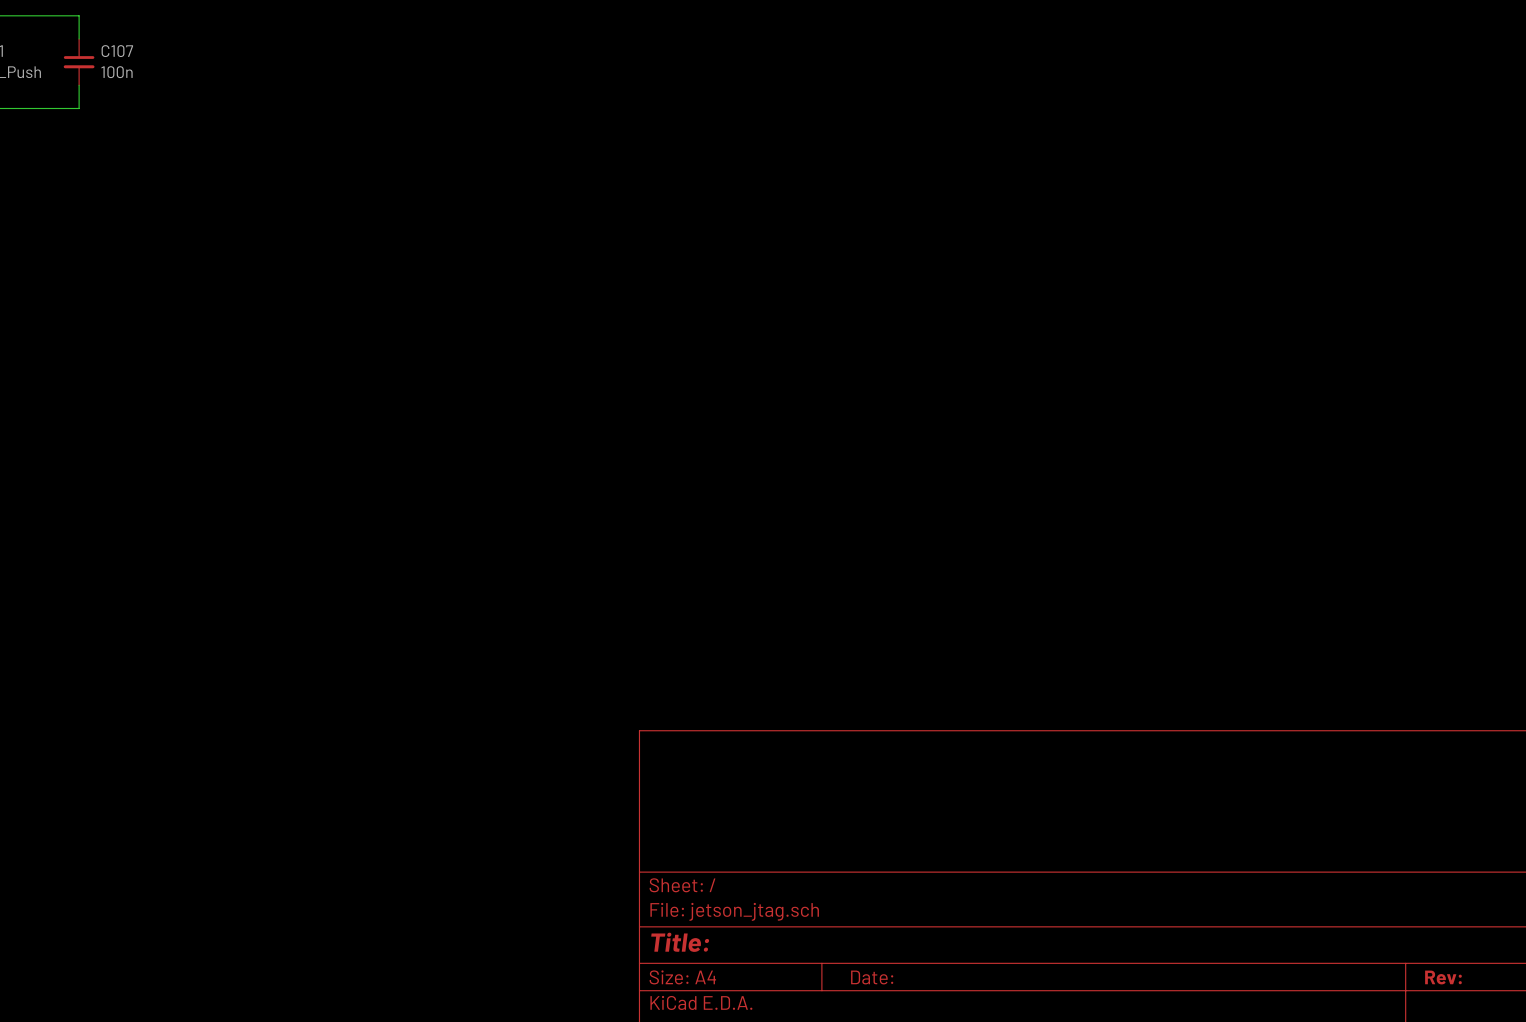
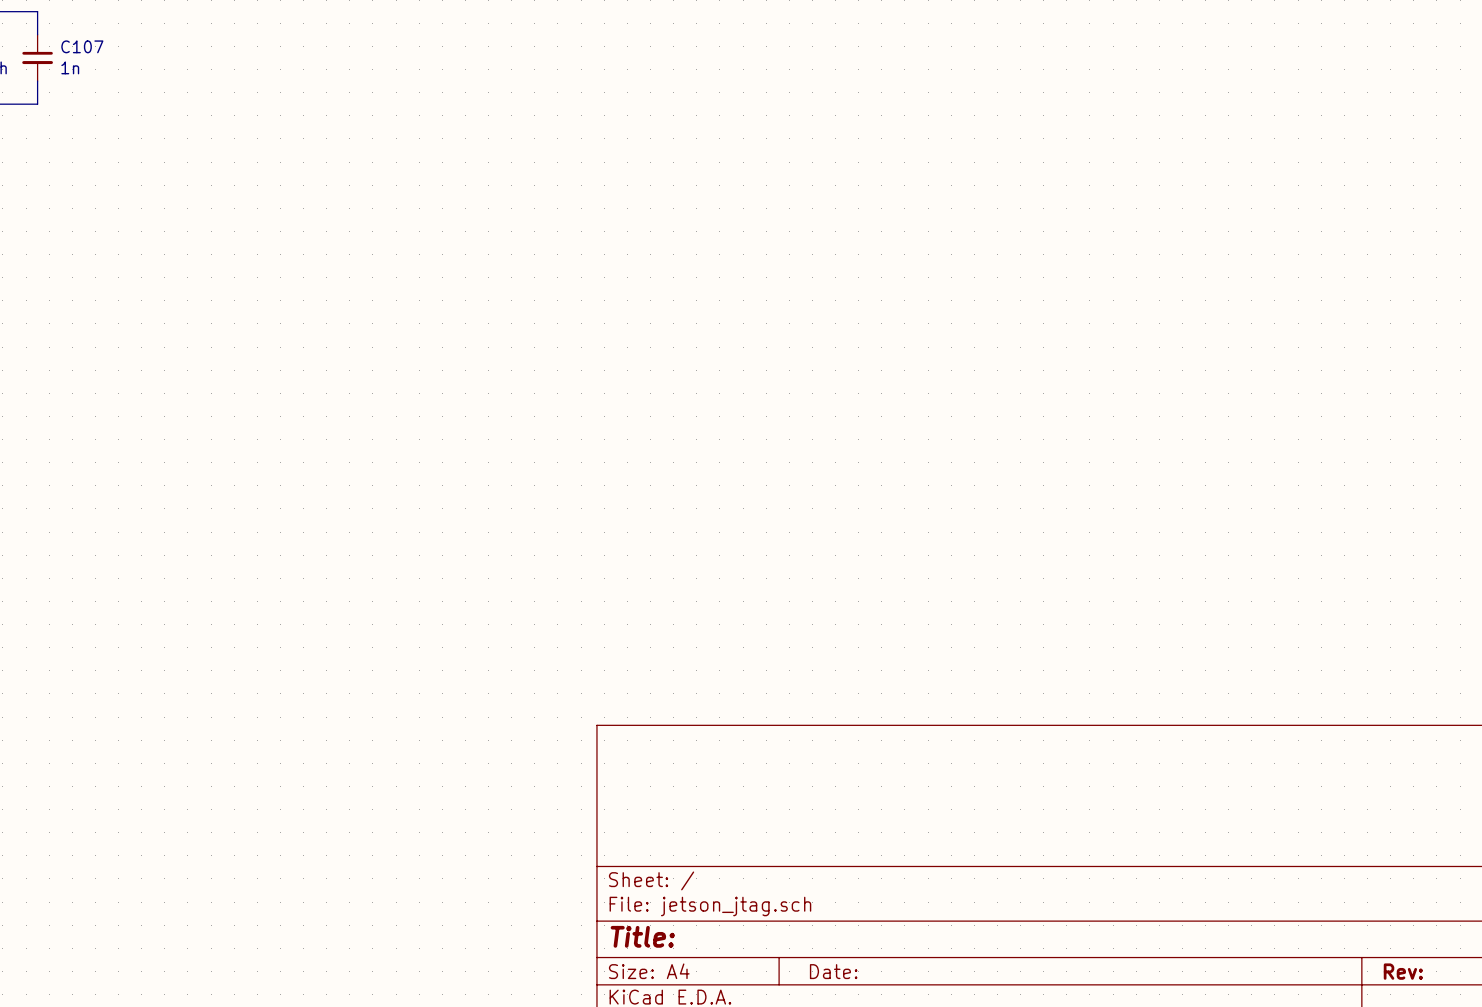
C107 value: 100n (117, 72) -> 1n (70, 67)

